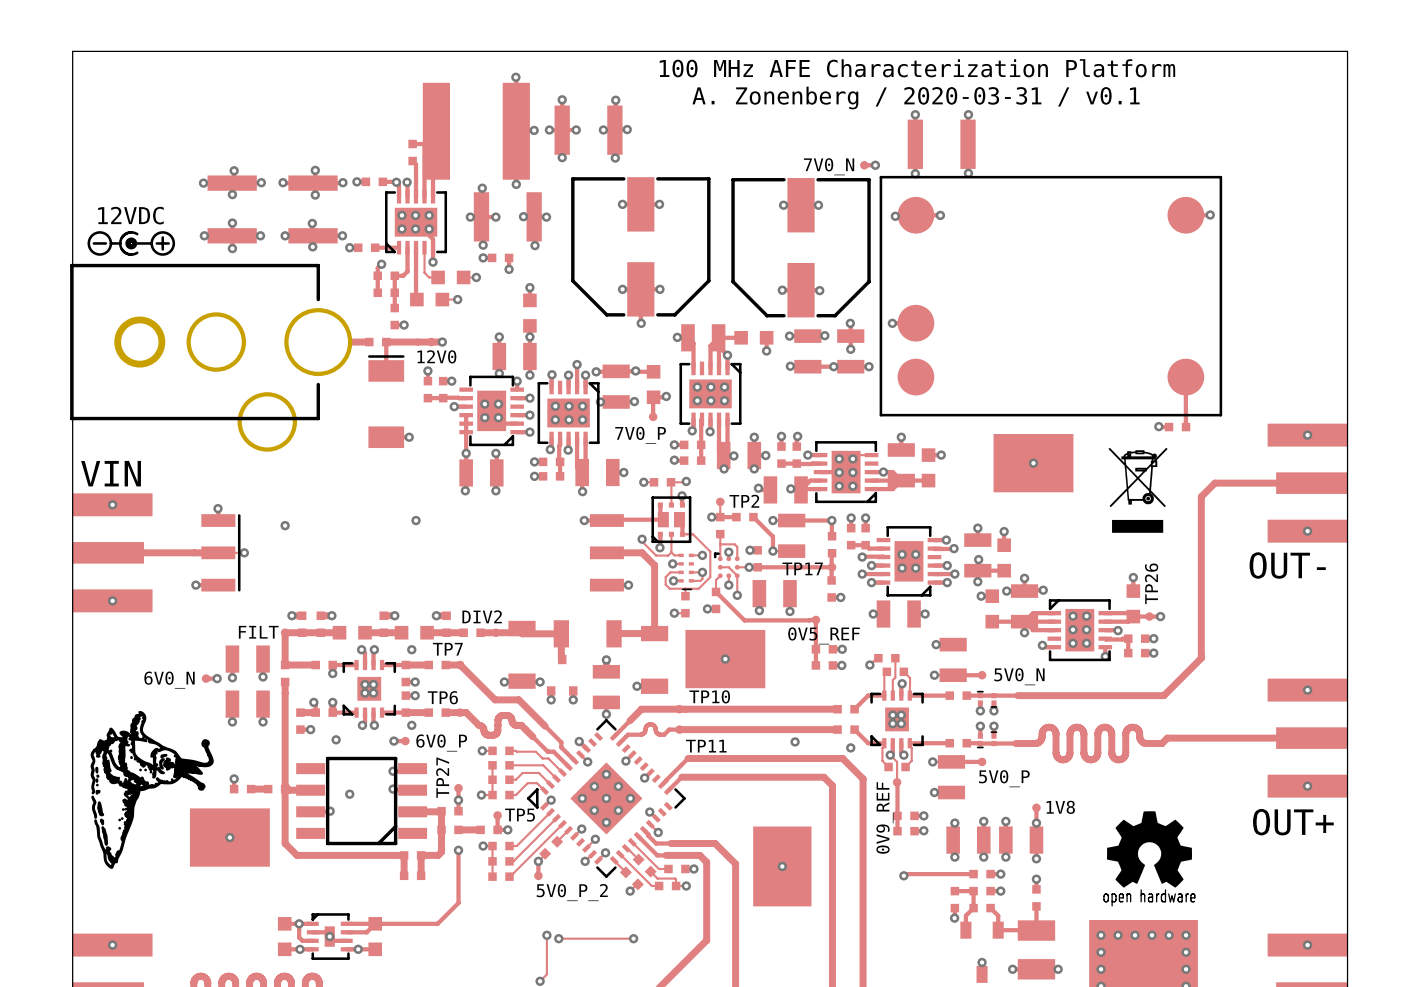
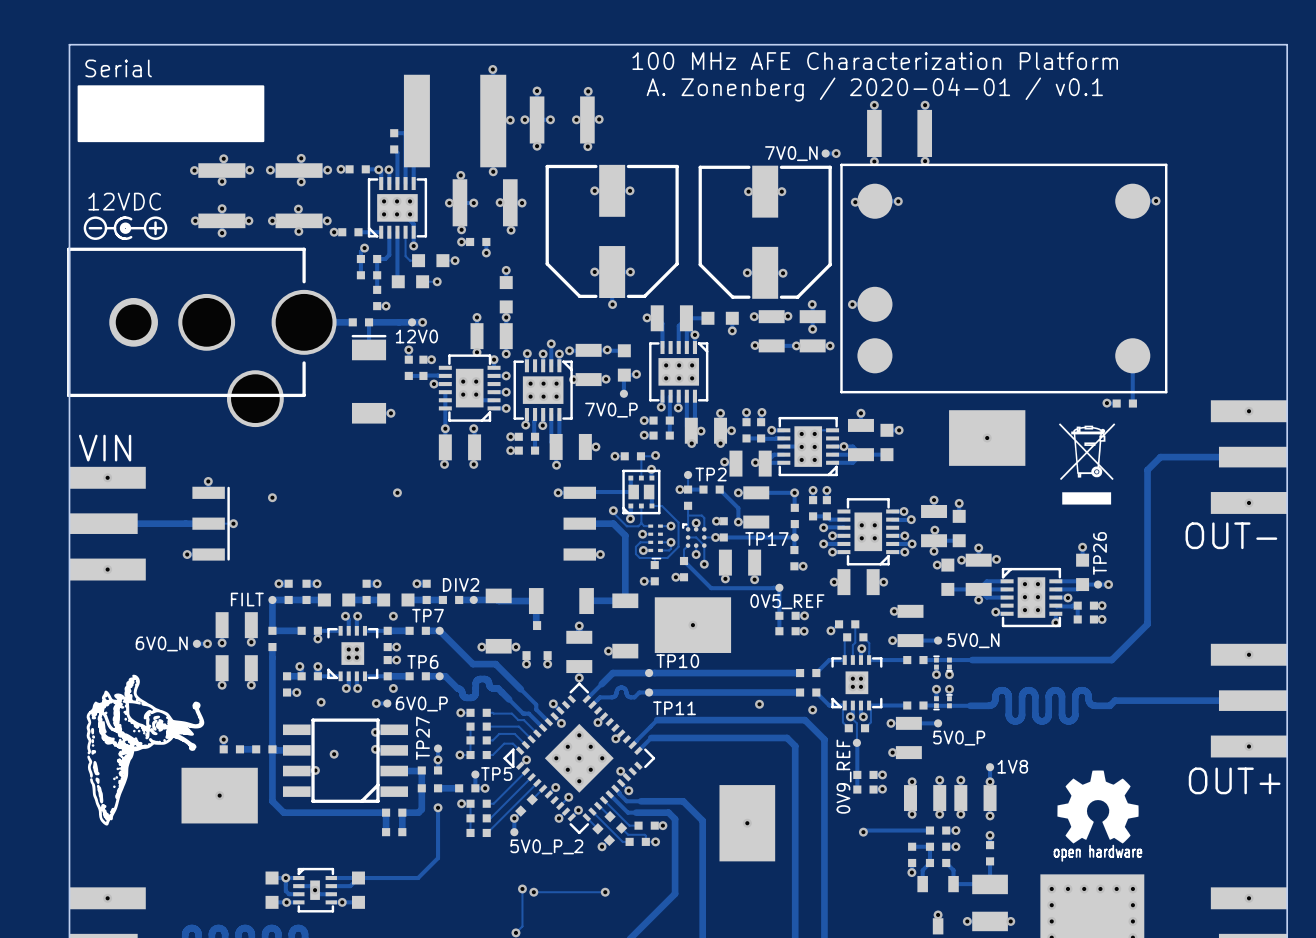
text: none -> Serial (118, 68)
drawing: none -> [77, 85, 265, 143]
text: A. Zonenberg / 2020-03-31 / v0.1 (916, 98) -> A. Zonenberg / 2020-04-01 / v0.1 (874, 89)

